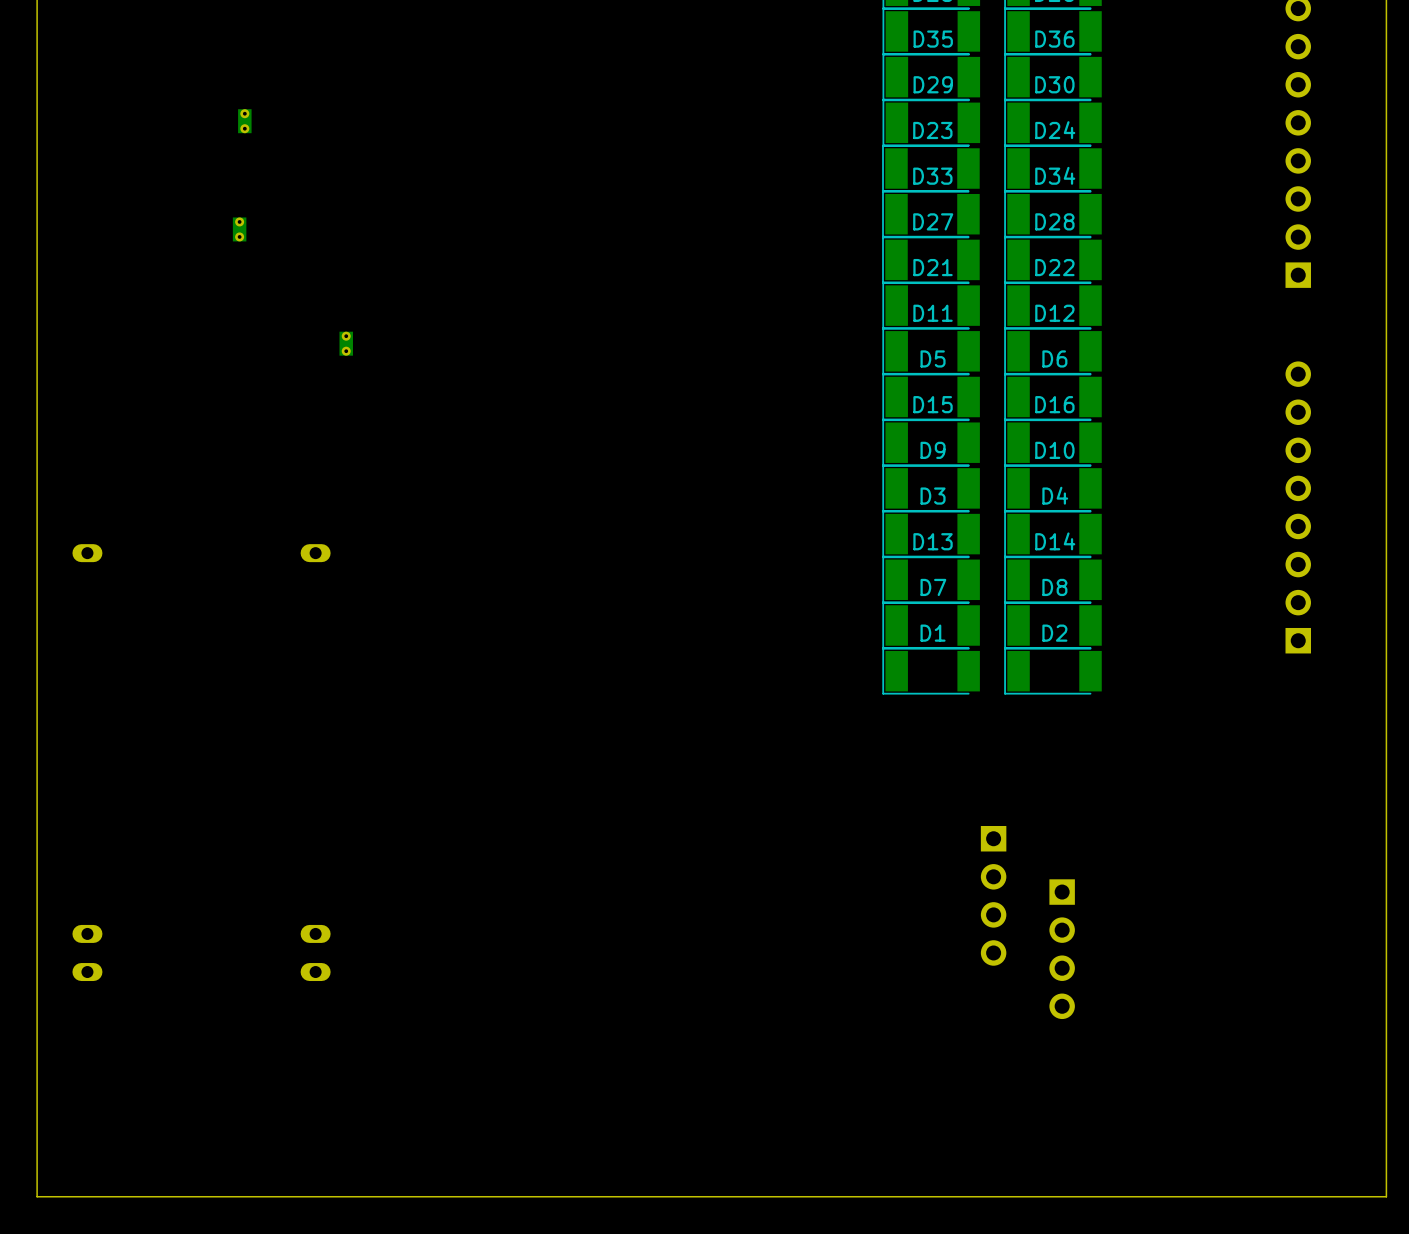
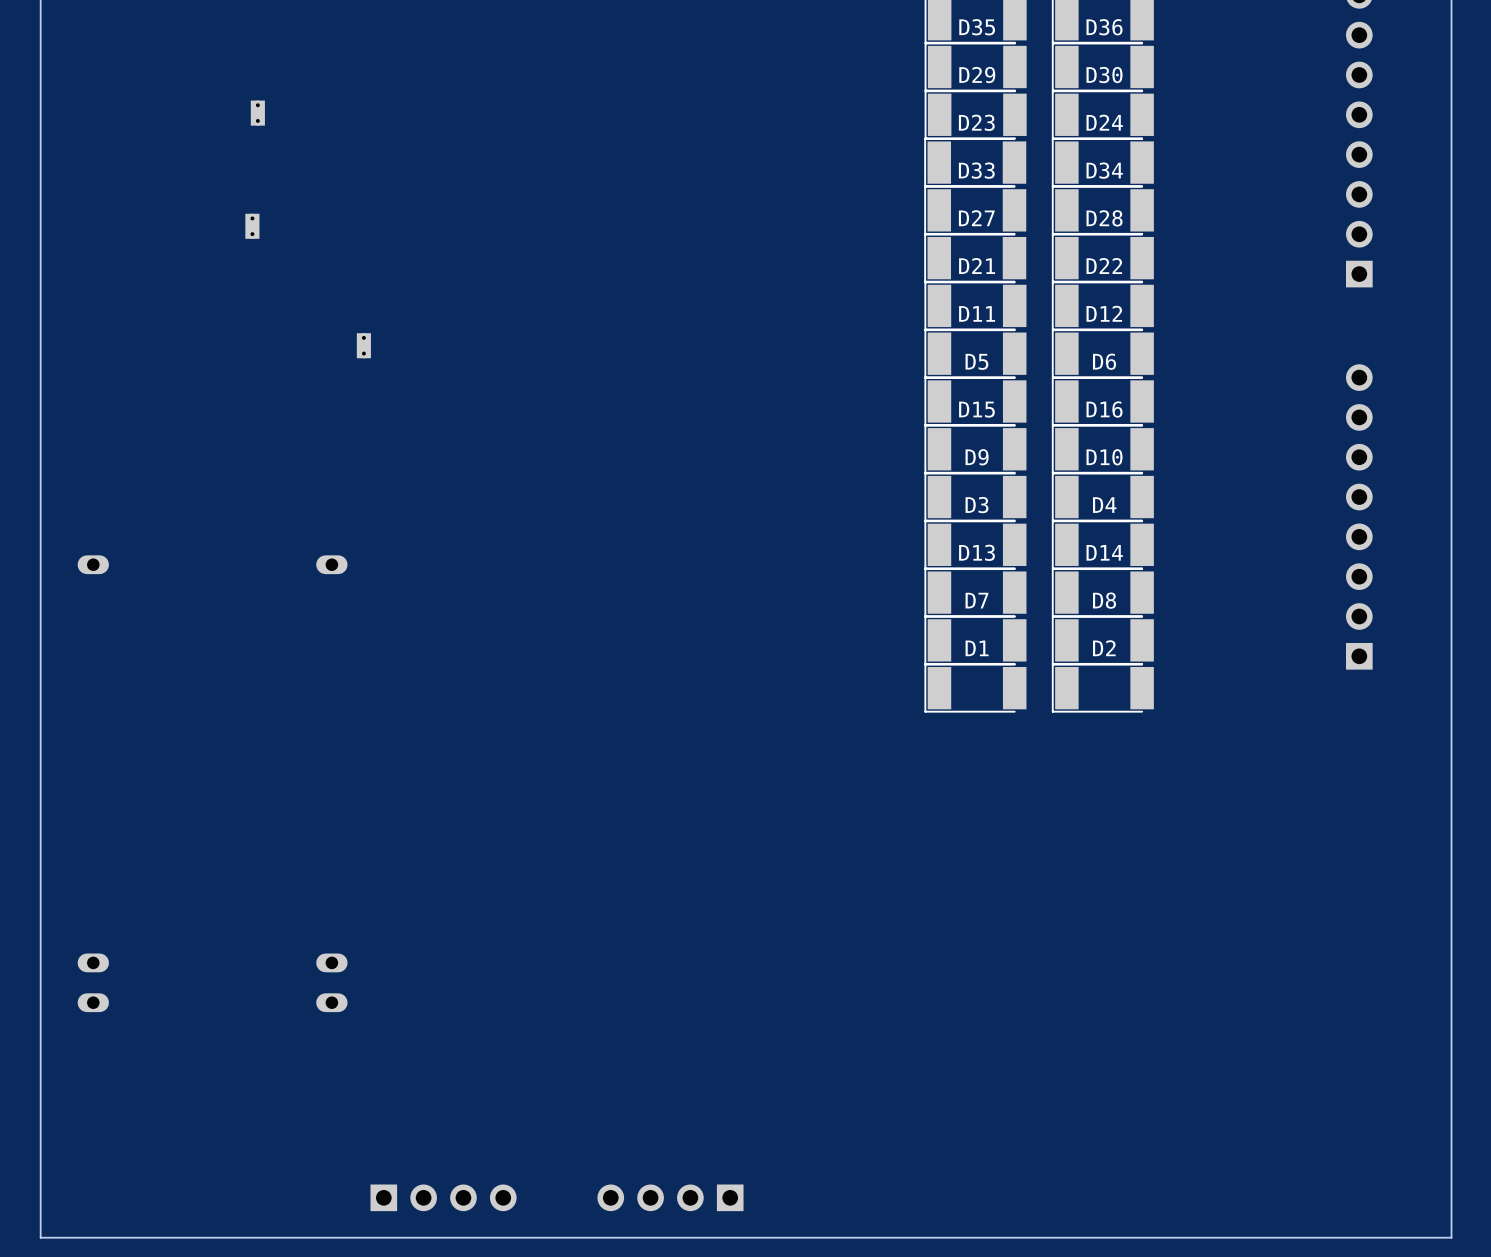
part: (993, 895) -> none
part: (1062, 949) -> none
part: none -> (443, 1197)
part: none -> (670, 1197)

